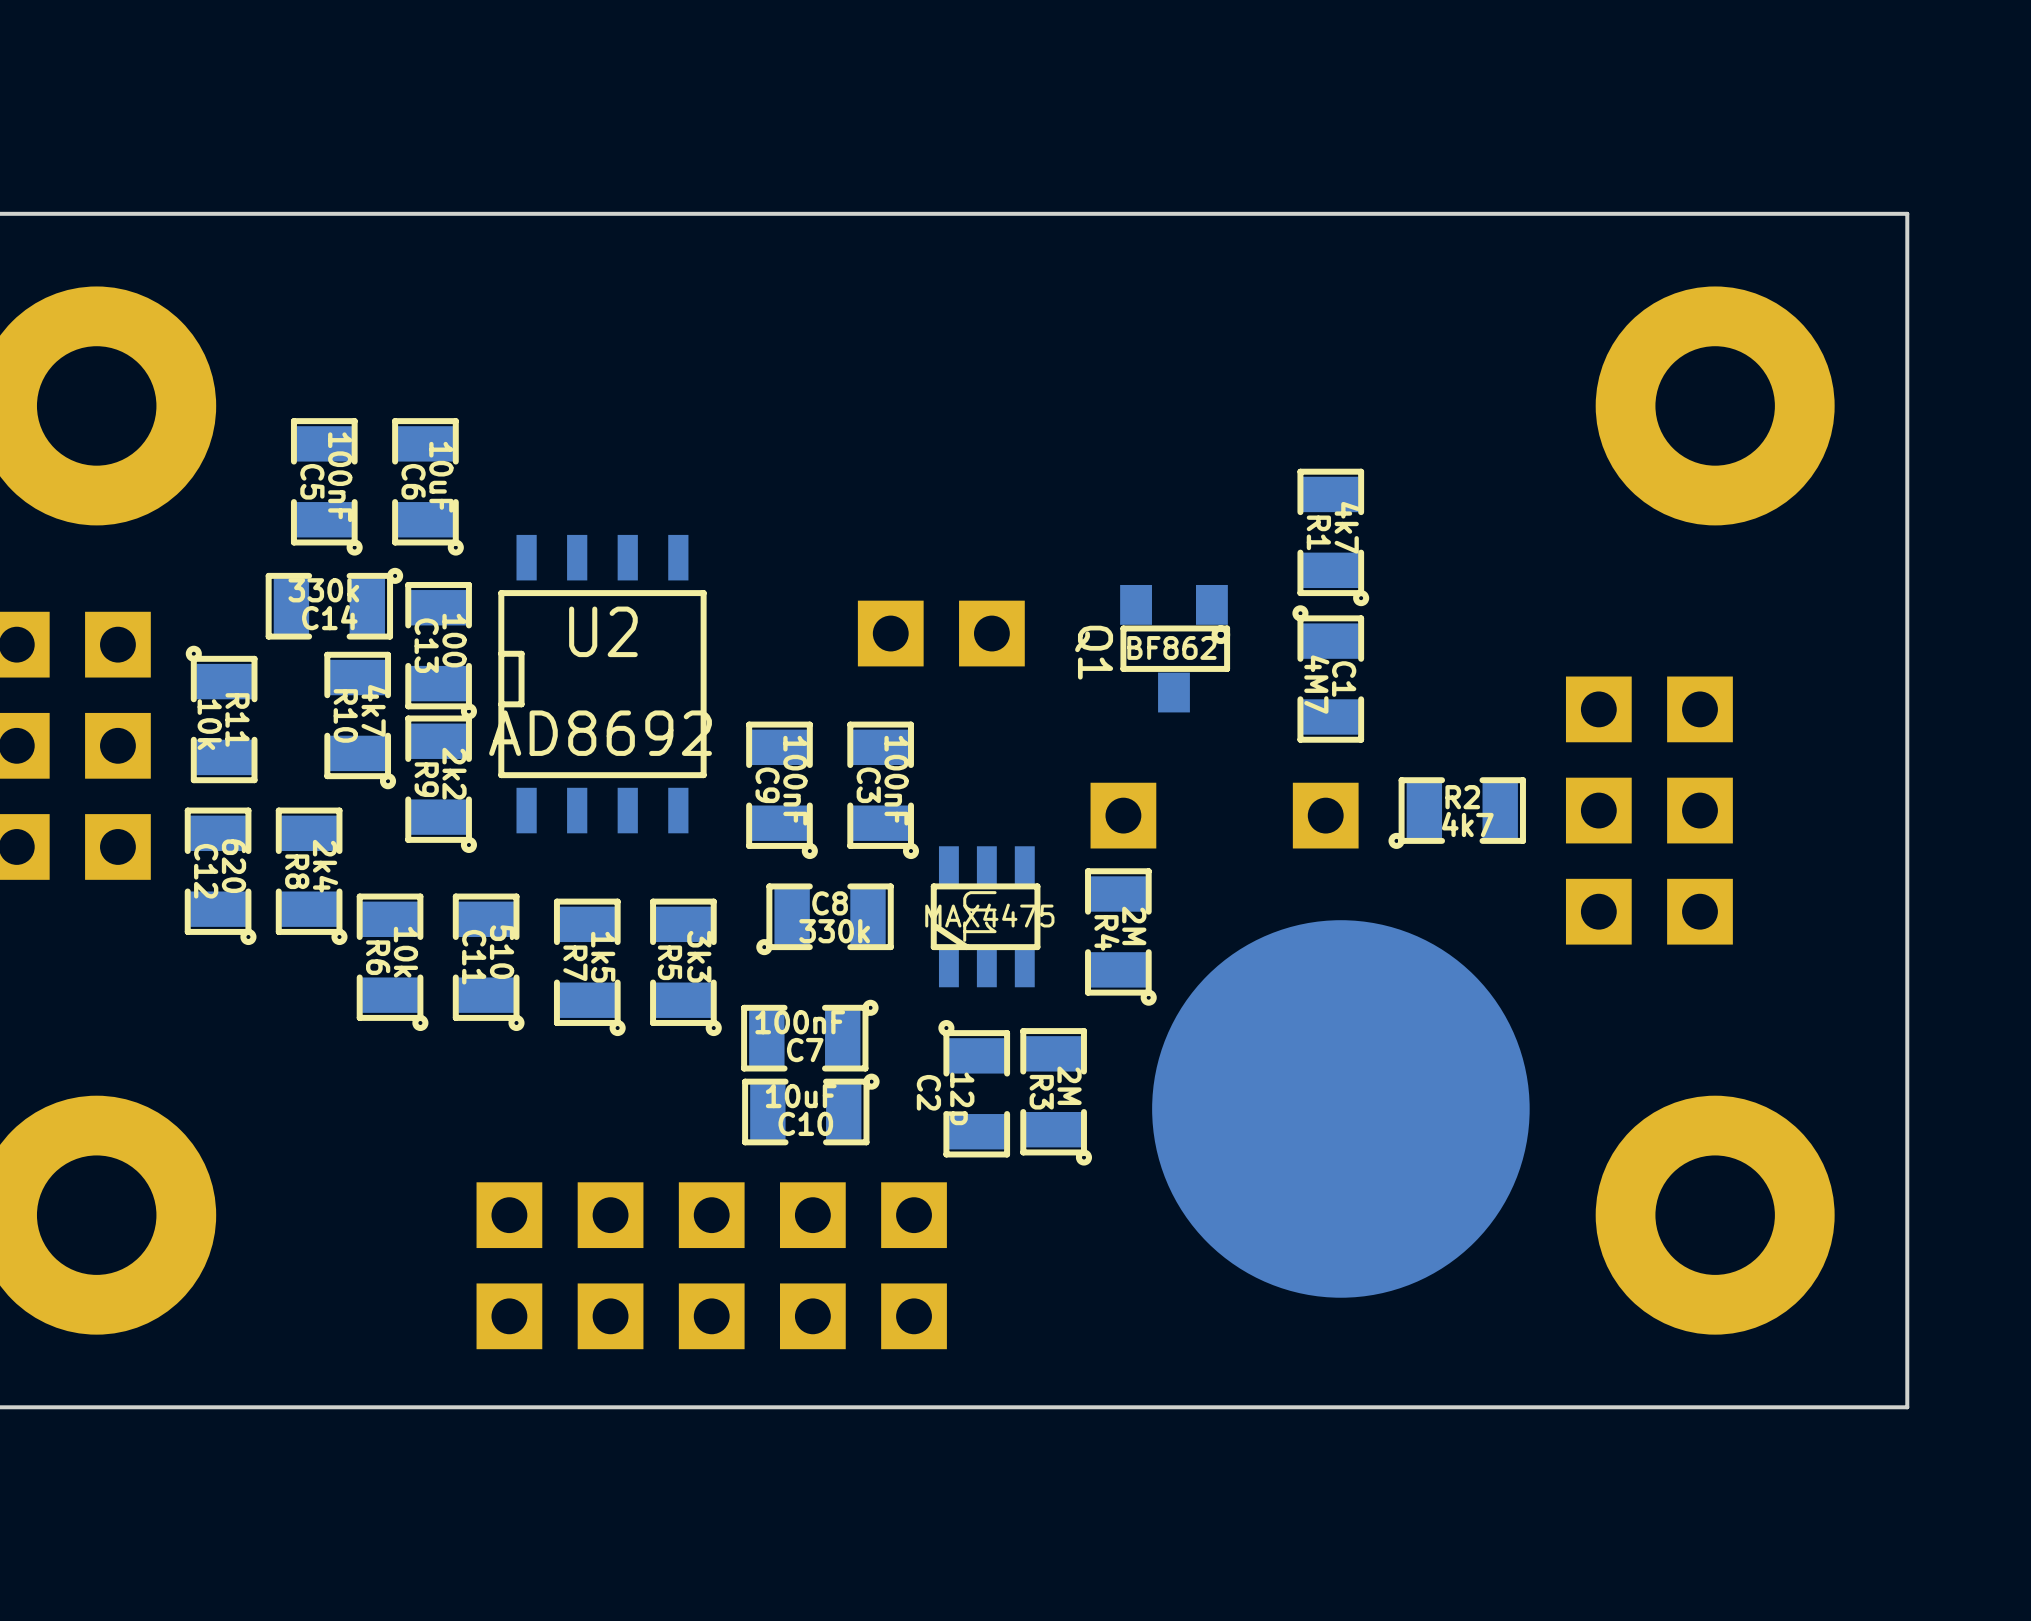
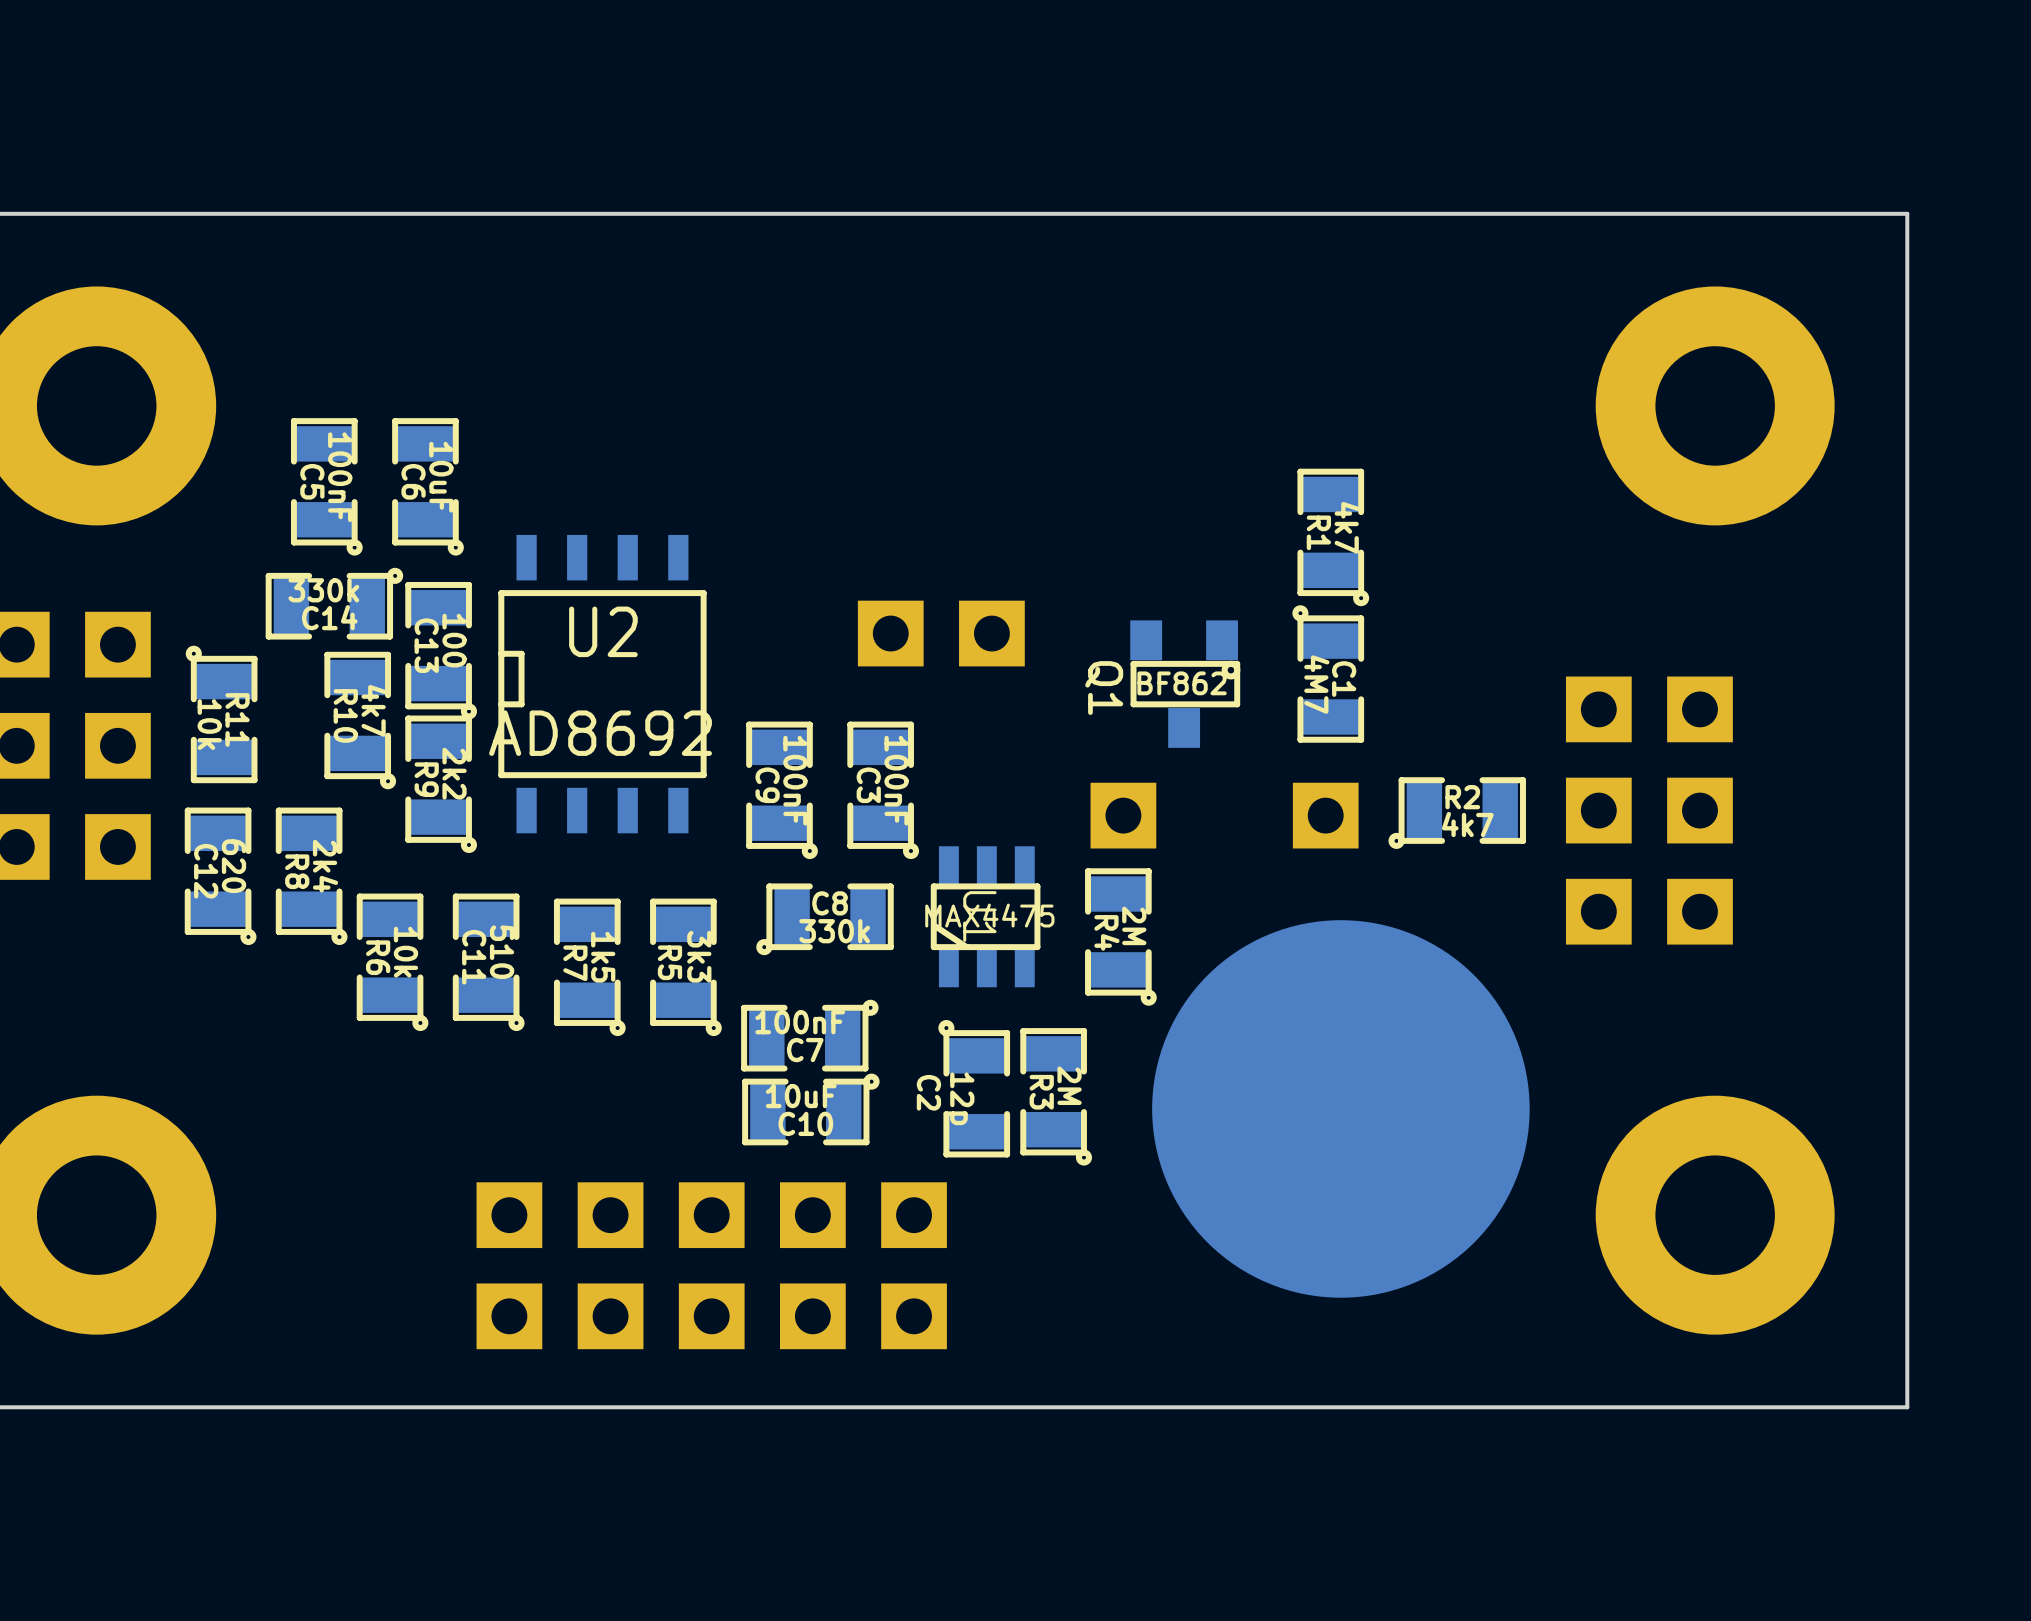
Q1 position: (1175, 648) -> (1185, 684)

